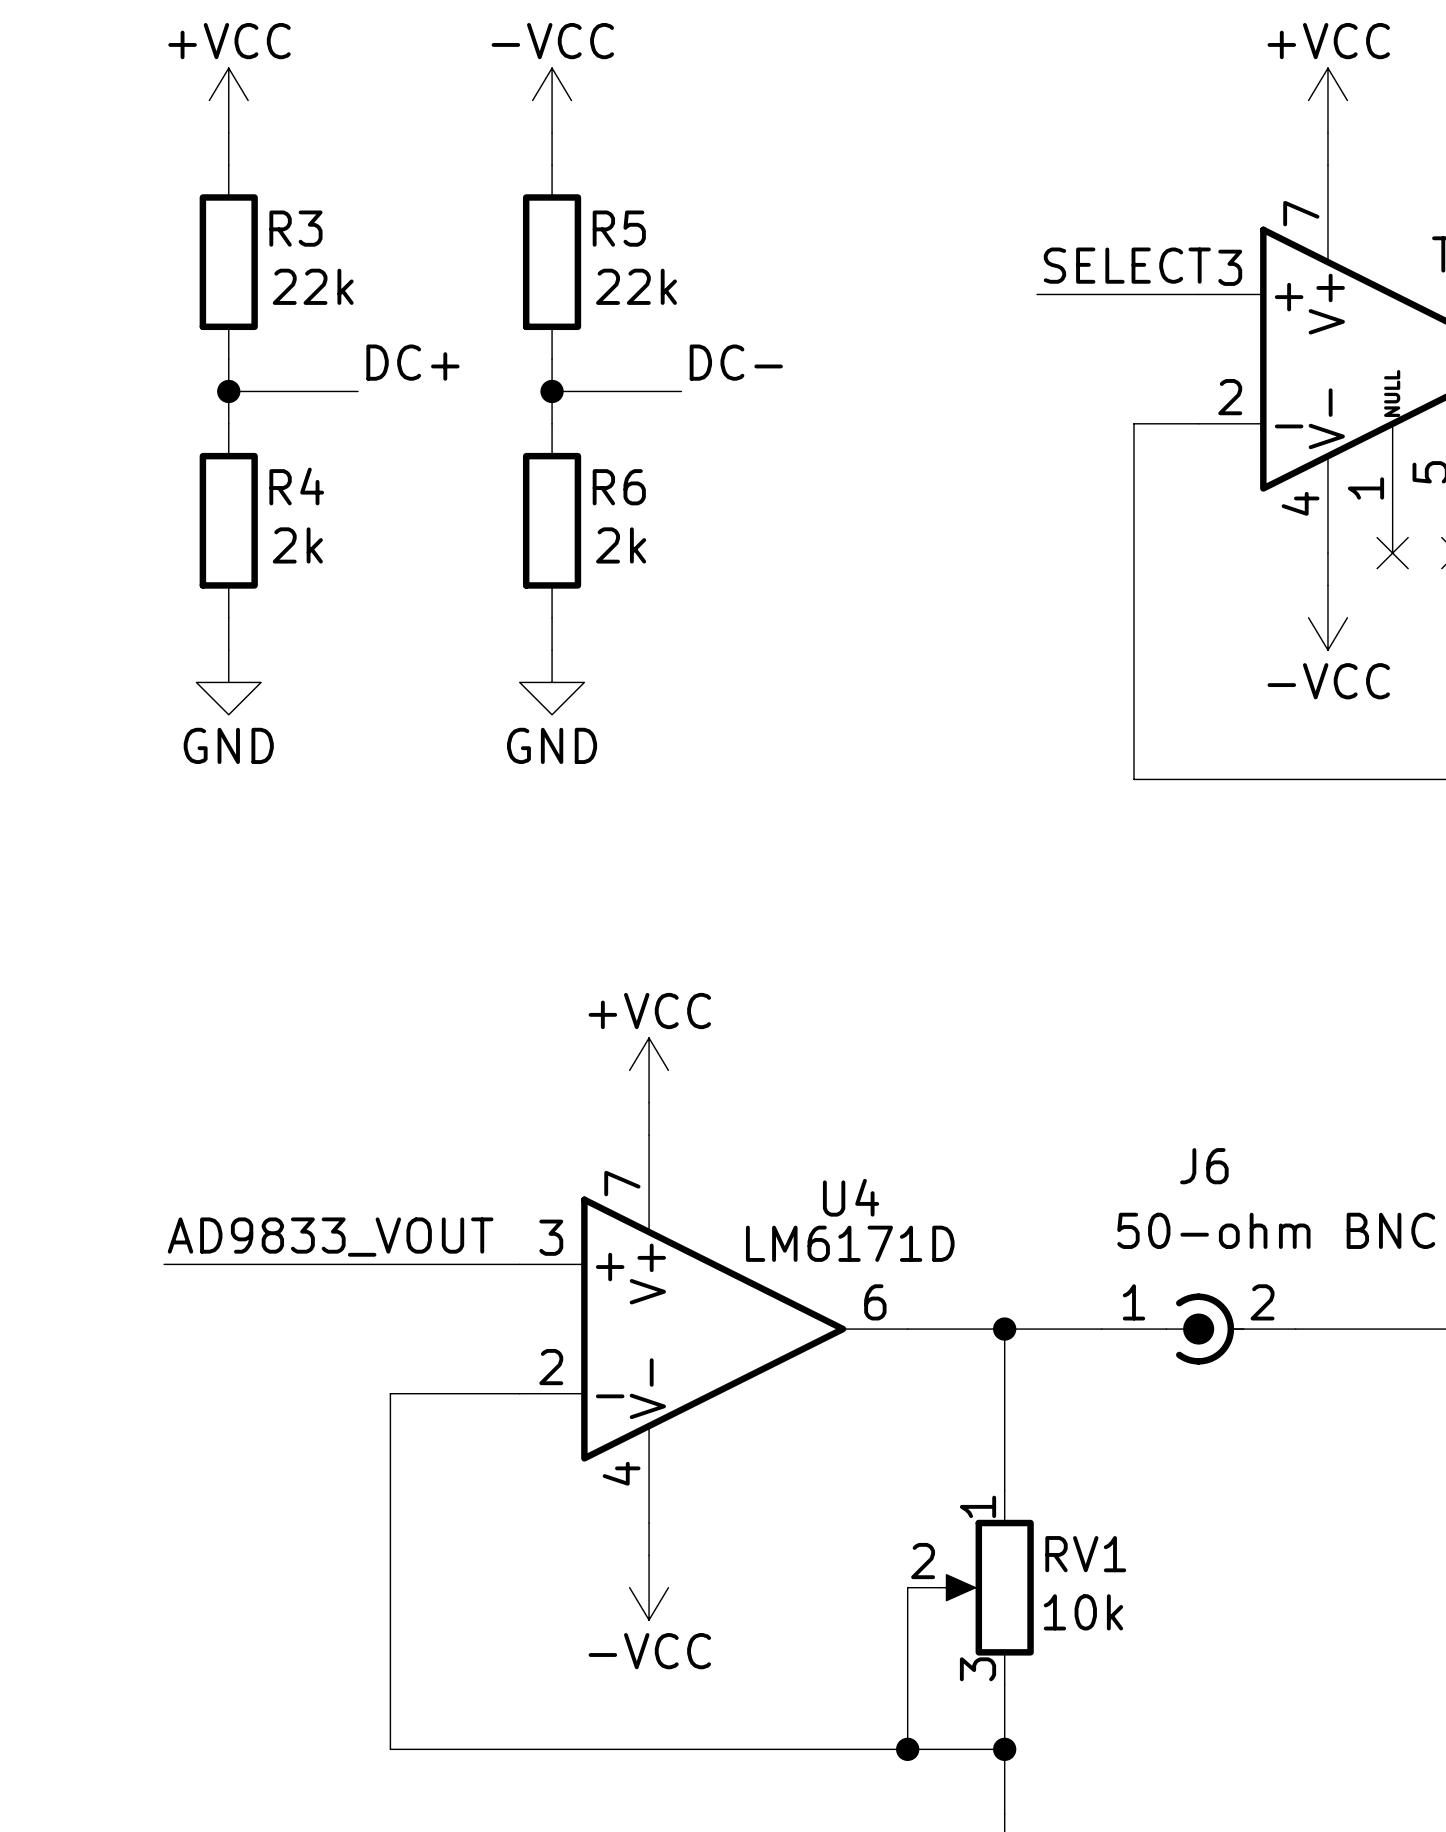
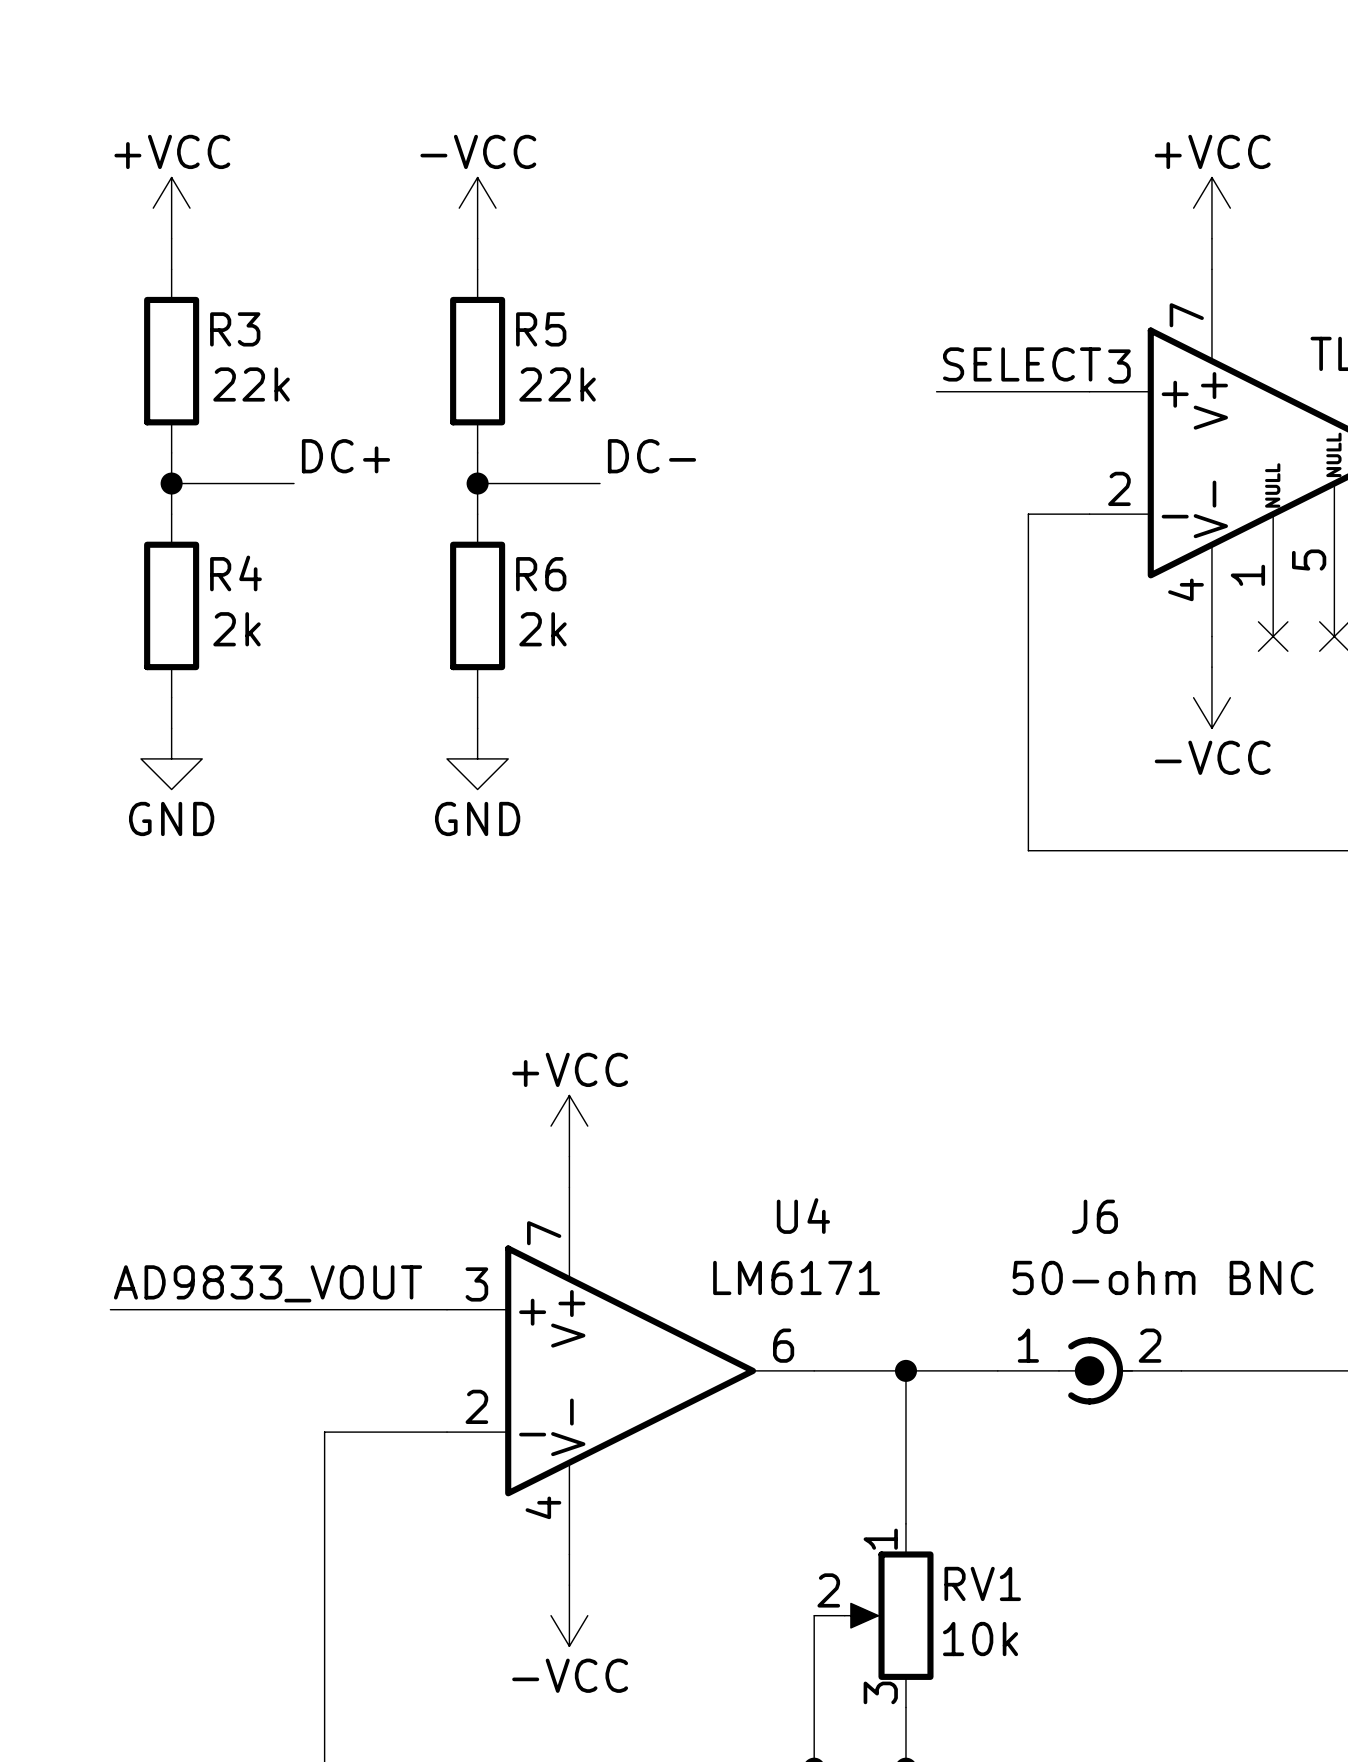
U4 name position: U4 (851, 1197) -> U4 (803, 1216)
U4 value: LM6171D (850, 1243) -> LM6171 (796, 1277)

